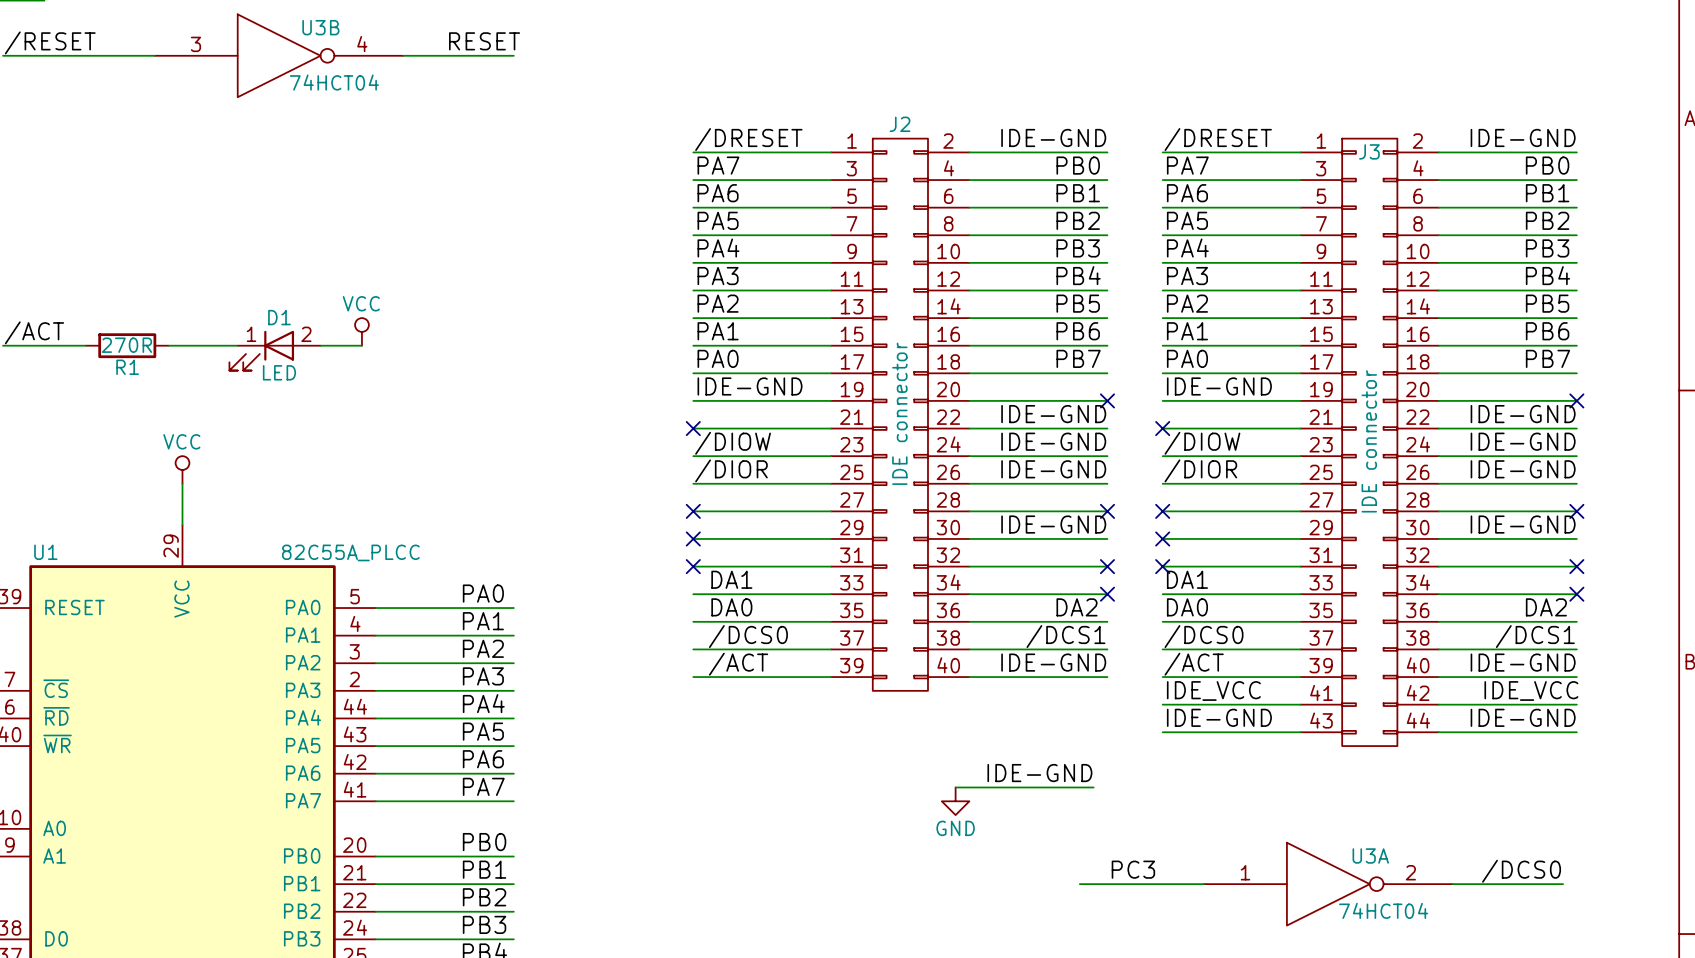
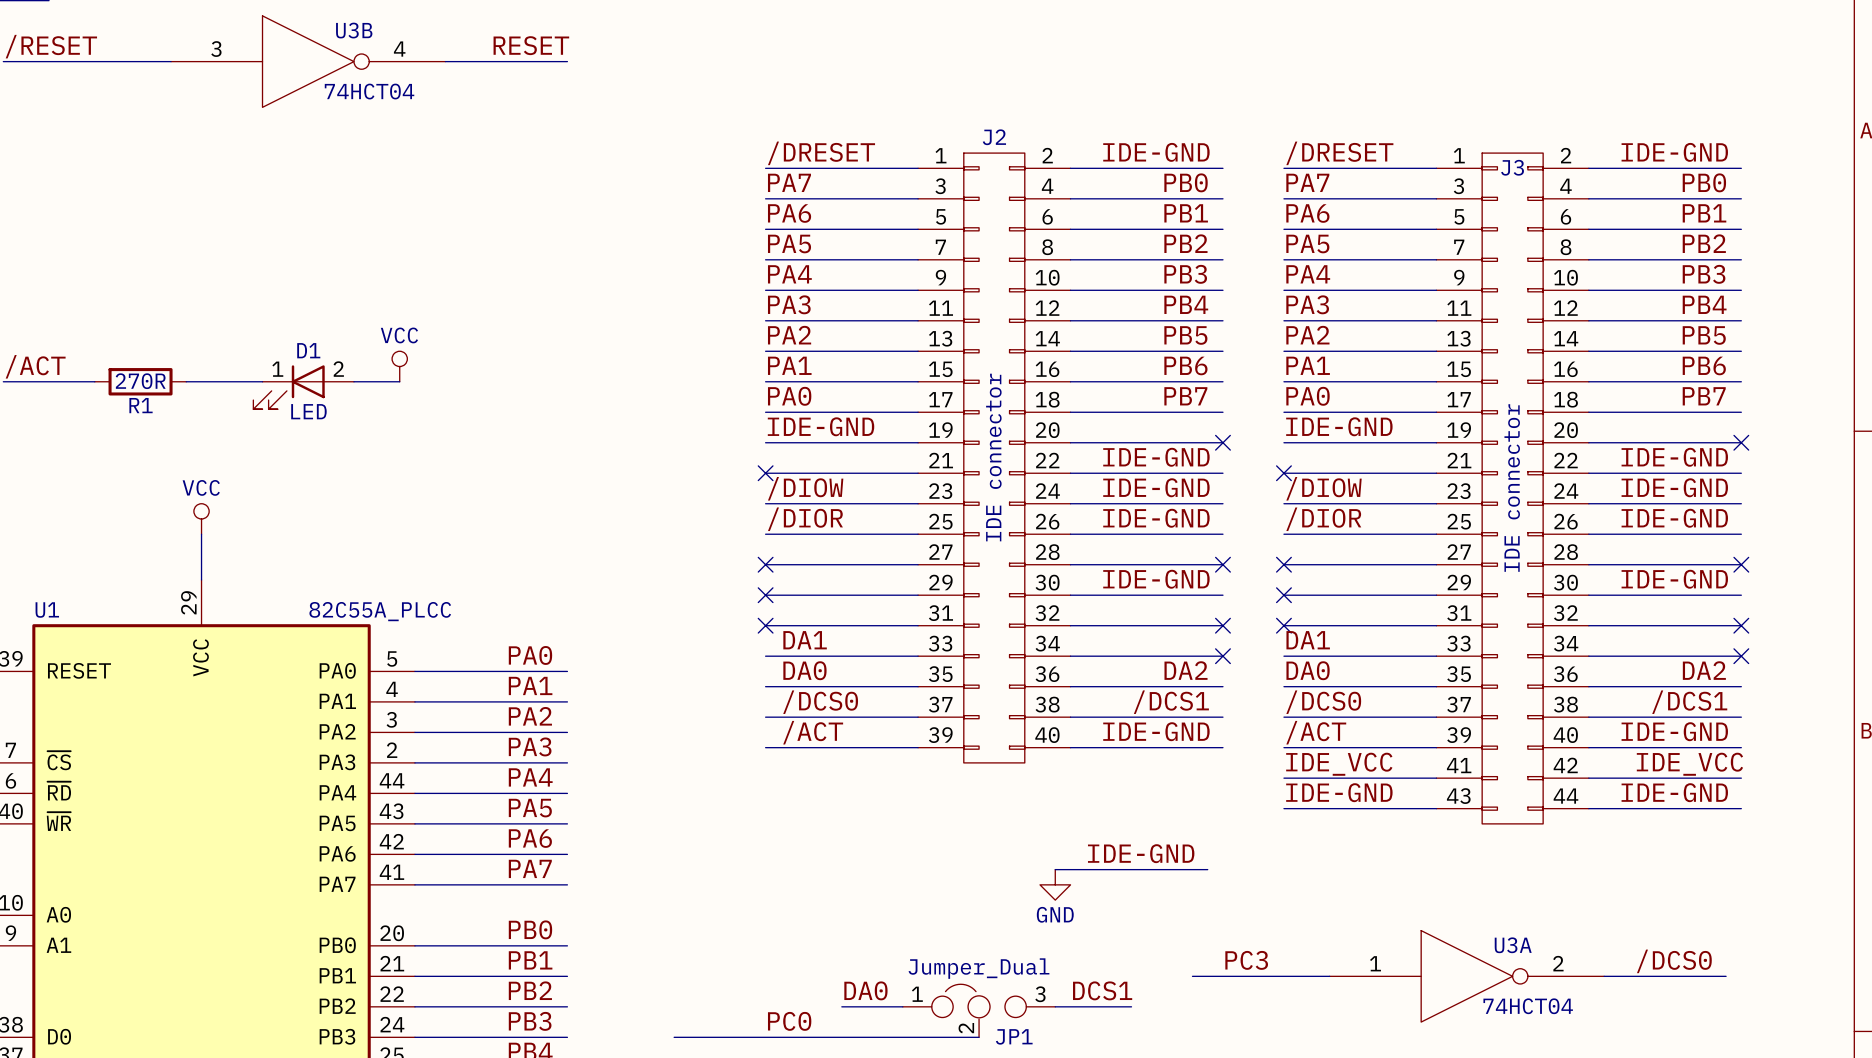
label: none -> DA0 (865, 990)
label: none -> DCS1 (1102, 990)
wire: none -> (841, 1006) (902, 1006)
wire: none -> (1055, 1006) (1131, 1006)
JP1: none -> Jumper_Dual (979, 1010)
label: none -> PC0 (789, 1021)
wire: none -> (674, 1037) (979, 1037)

